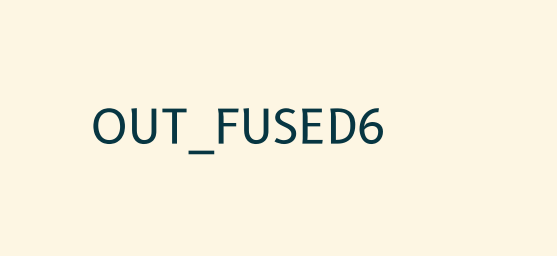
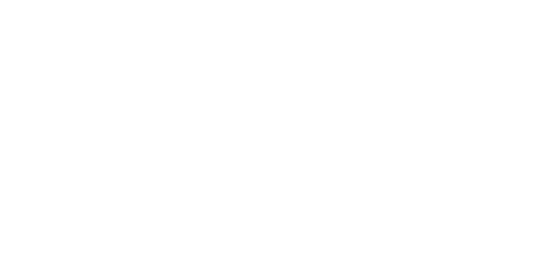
label: OUT_FUSED6 (238, 131) -> none

